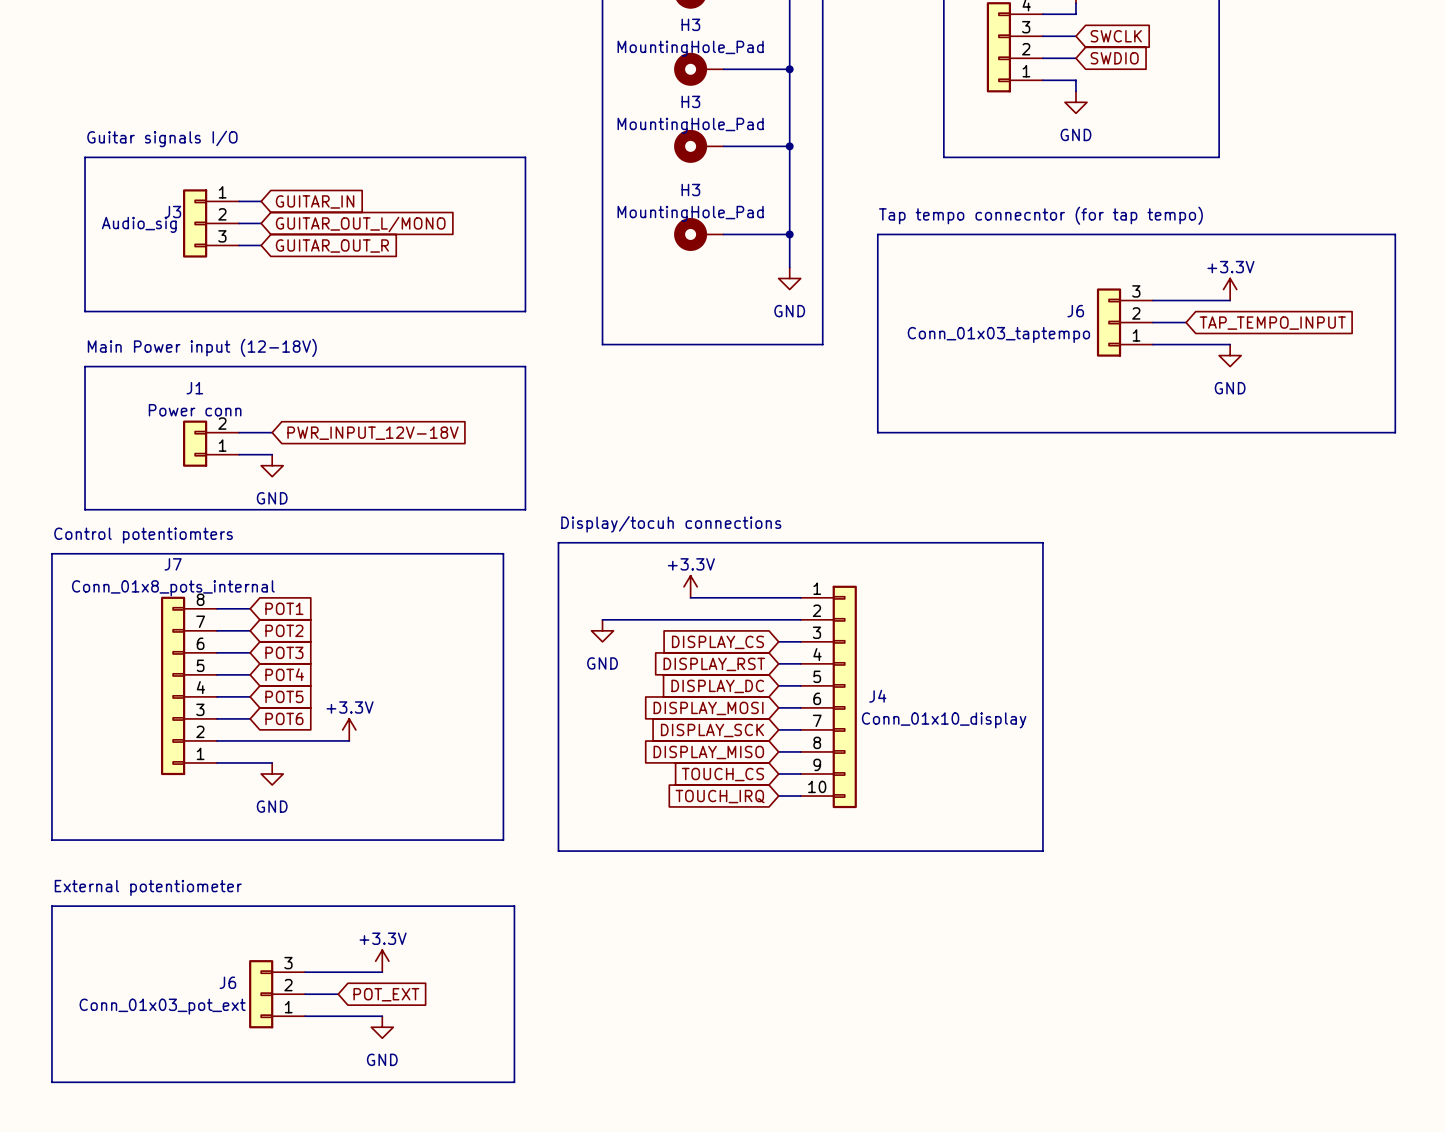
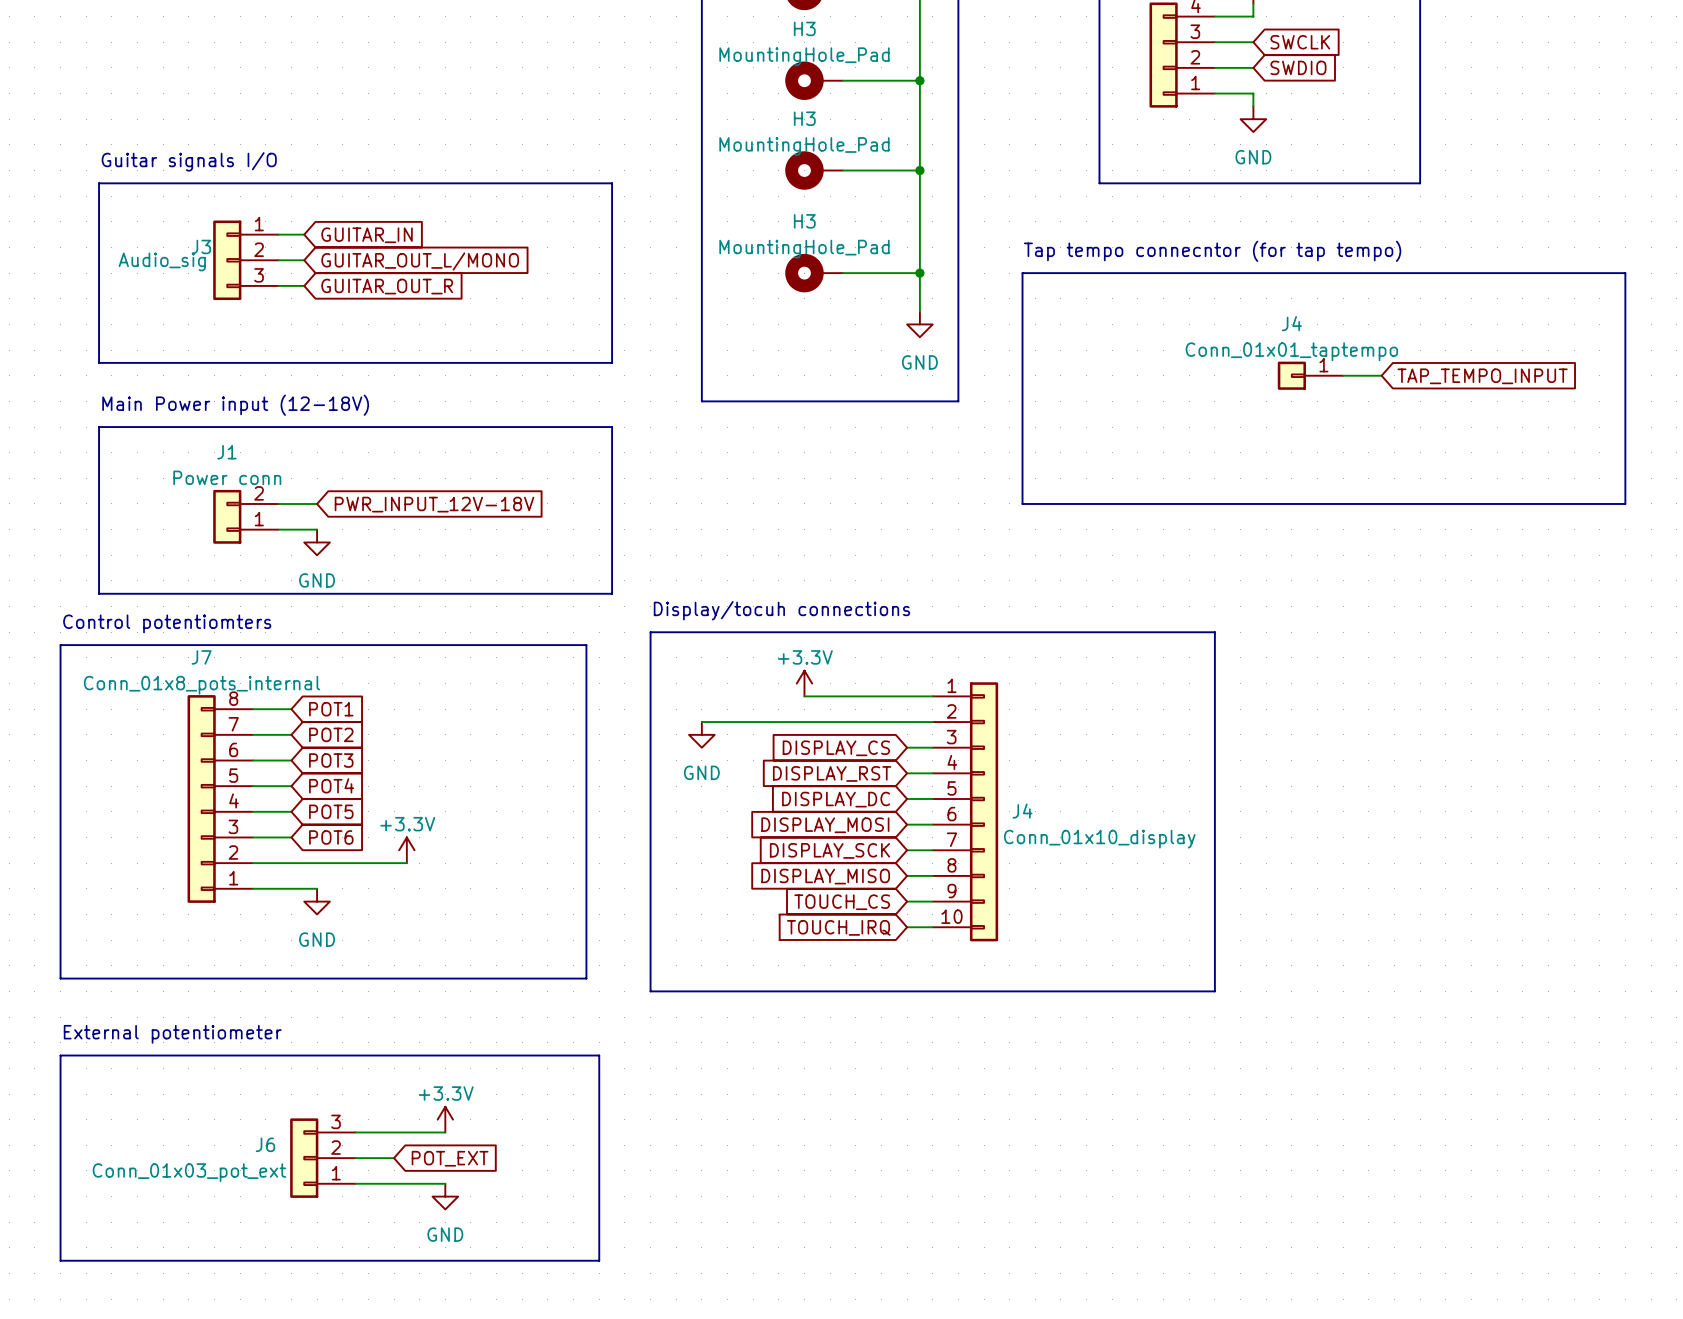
power symbol: +3.3V (1230, 289) -> none
wire: (1153, 300) (1230, 300) -> none
J6: Conn_01x03_taptempo (1124, 322) -> none
J4: none -> Conn_01x01_taptempo (1310, 375)
wire: (1153, 344) (1230, 344) -> none
power symbol: GND (1230, 355) -> none

